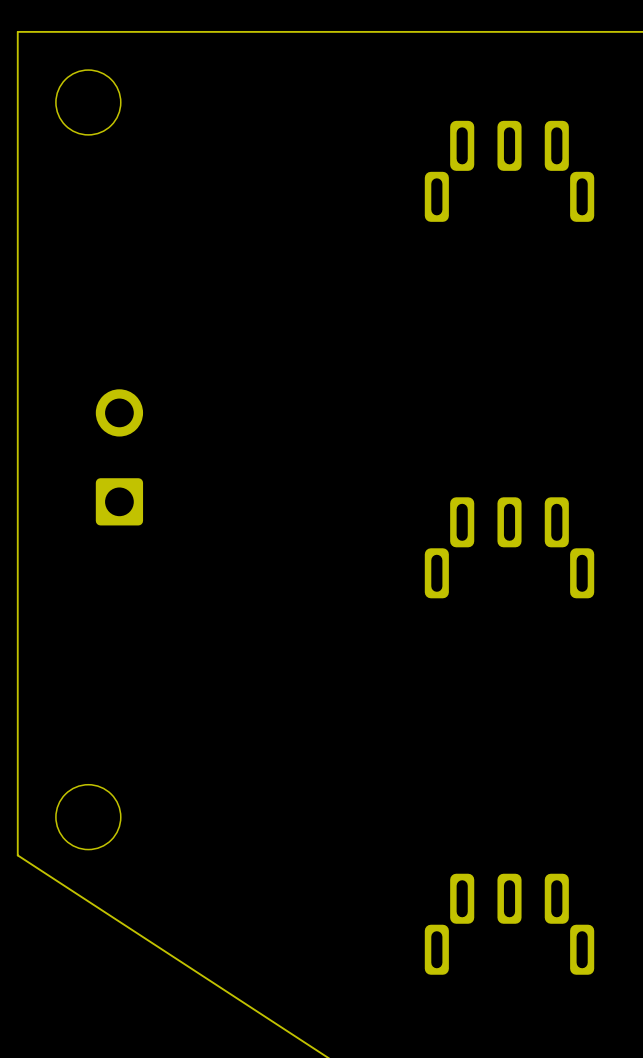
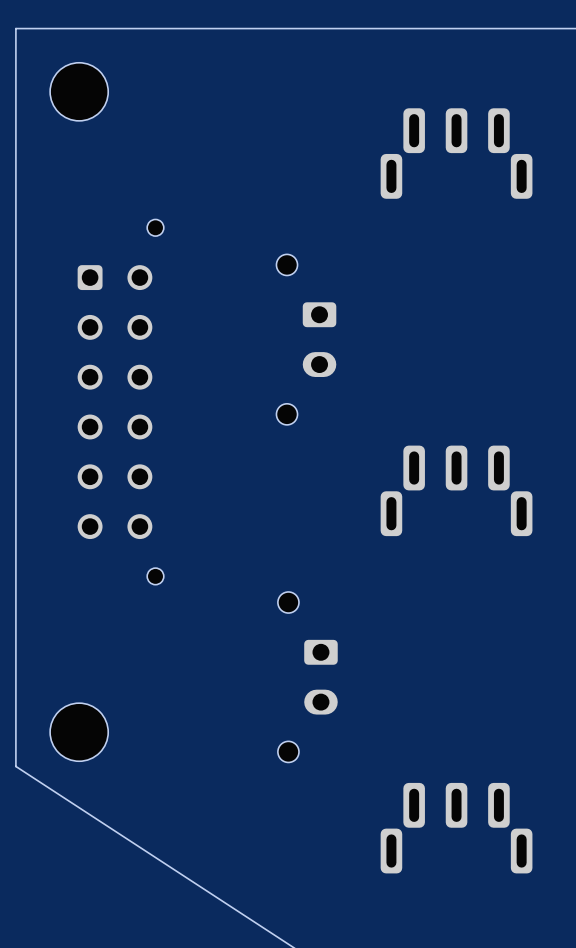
part: none -> (306, 339)
part footprint: [95, 389, 144, 526] -> [77, 219, 164, 585]
part: none -> (307, 677)

